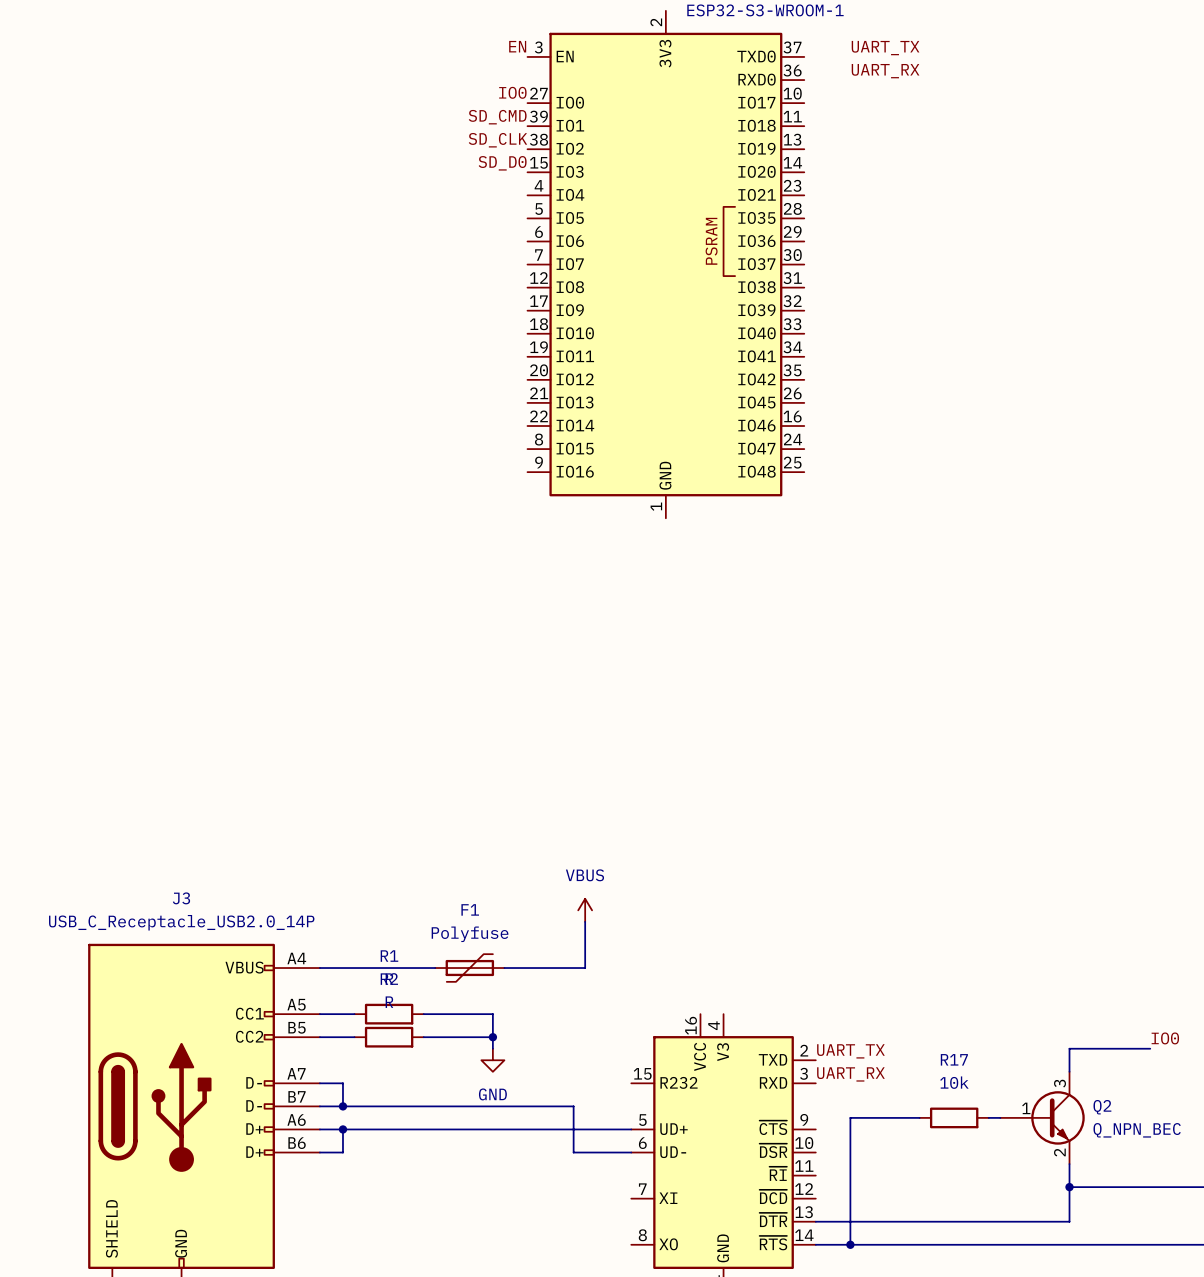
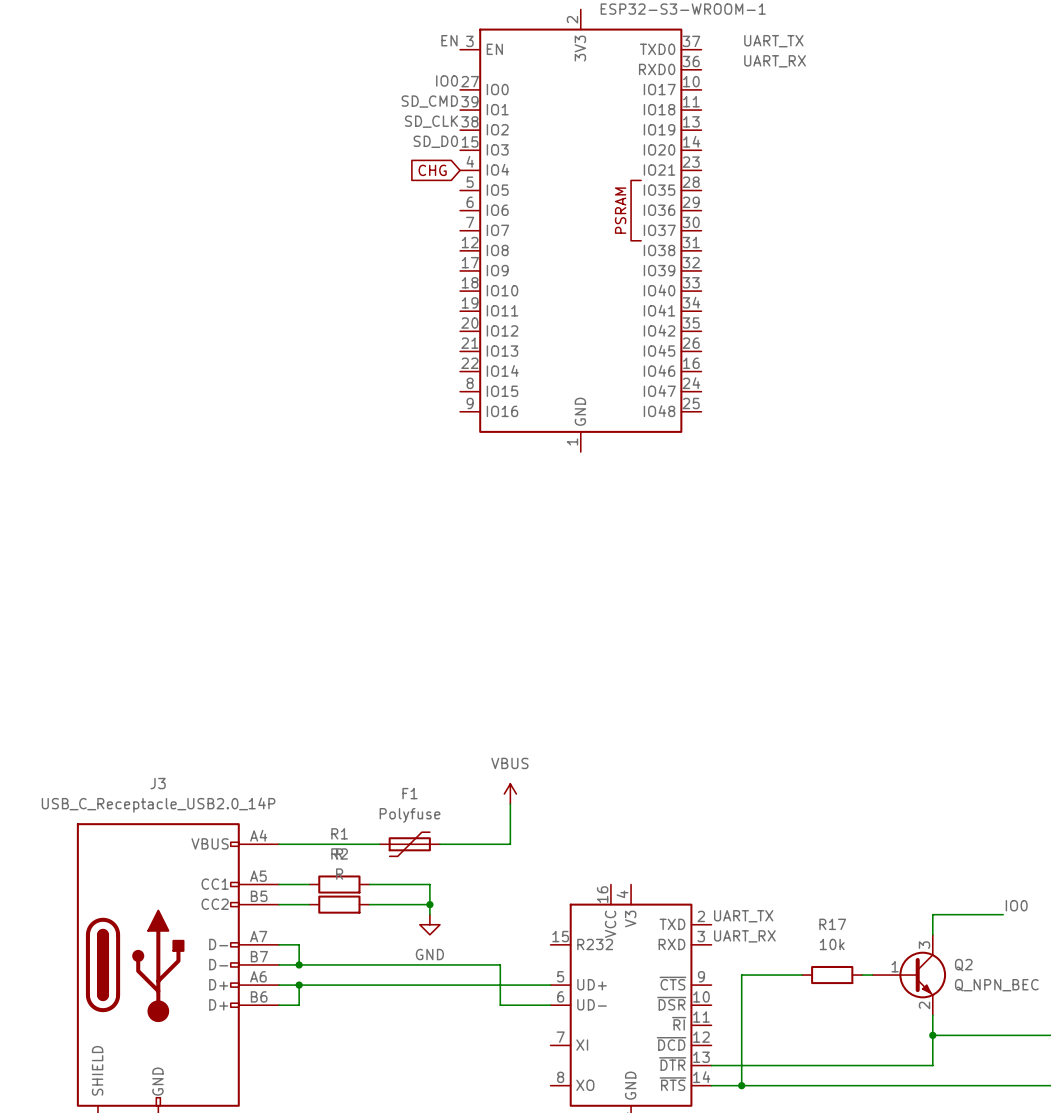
global label: none -> CHG (432, 170)

